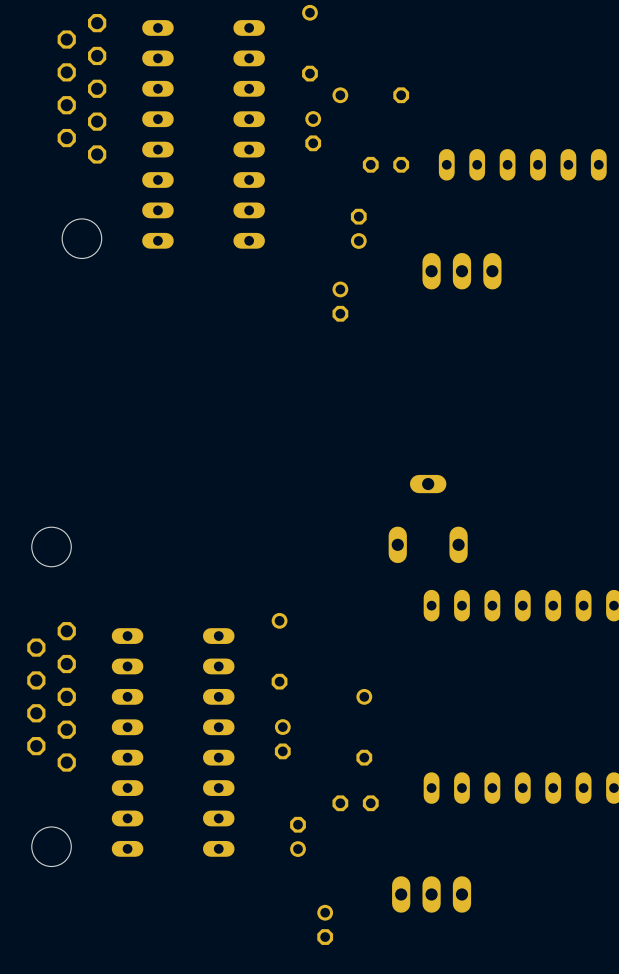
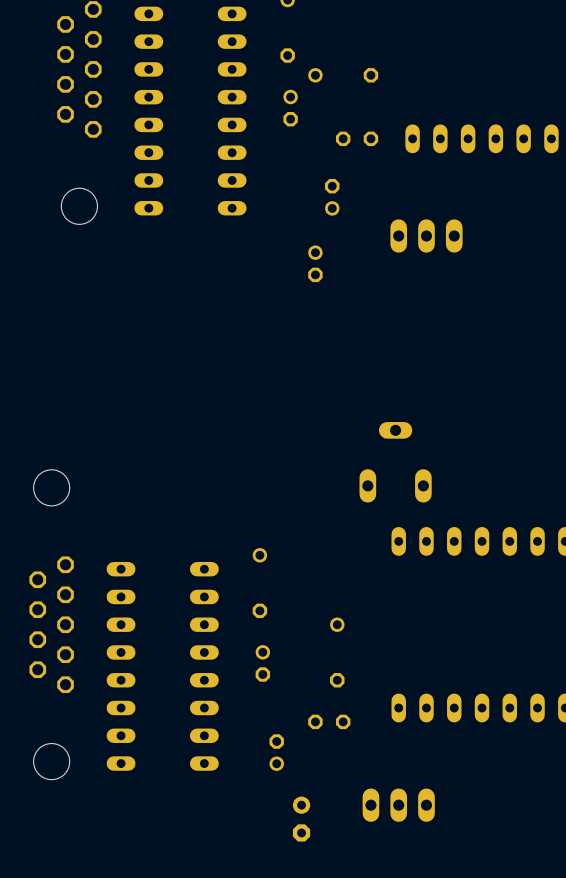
part: none -> (301, 819)
part: (325, 924) -> none

